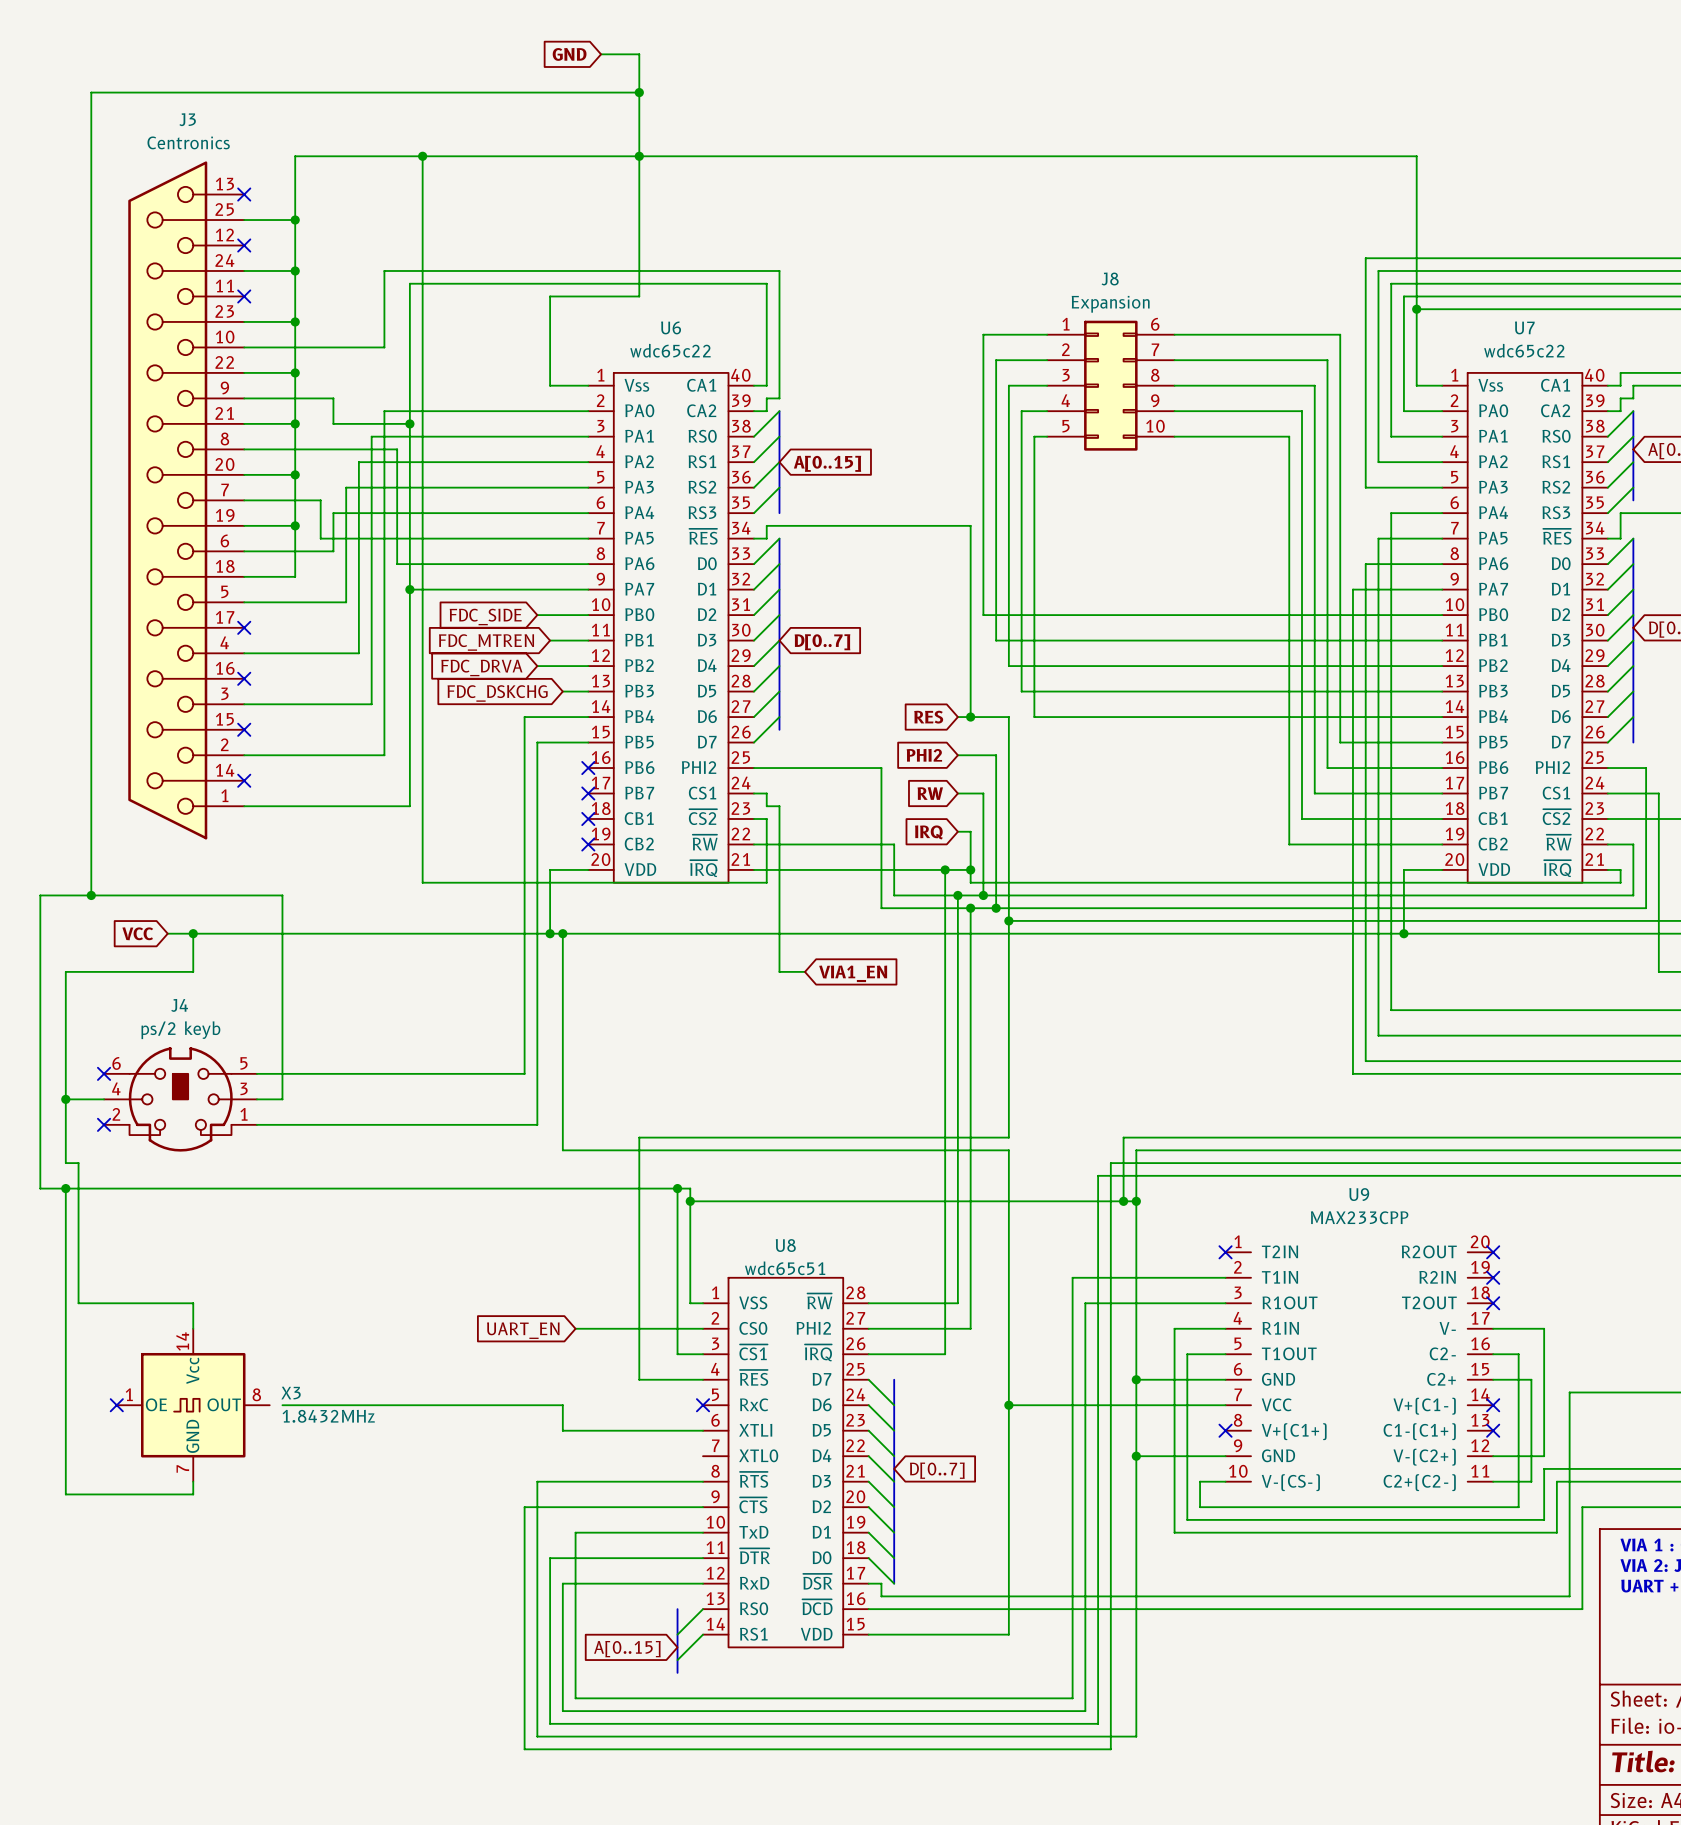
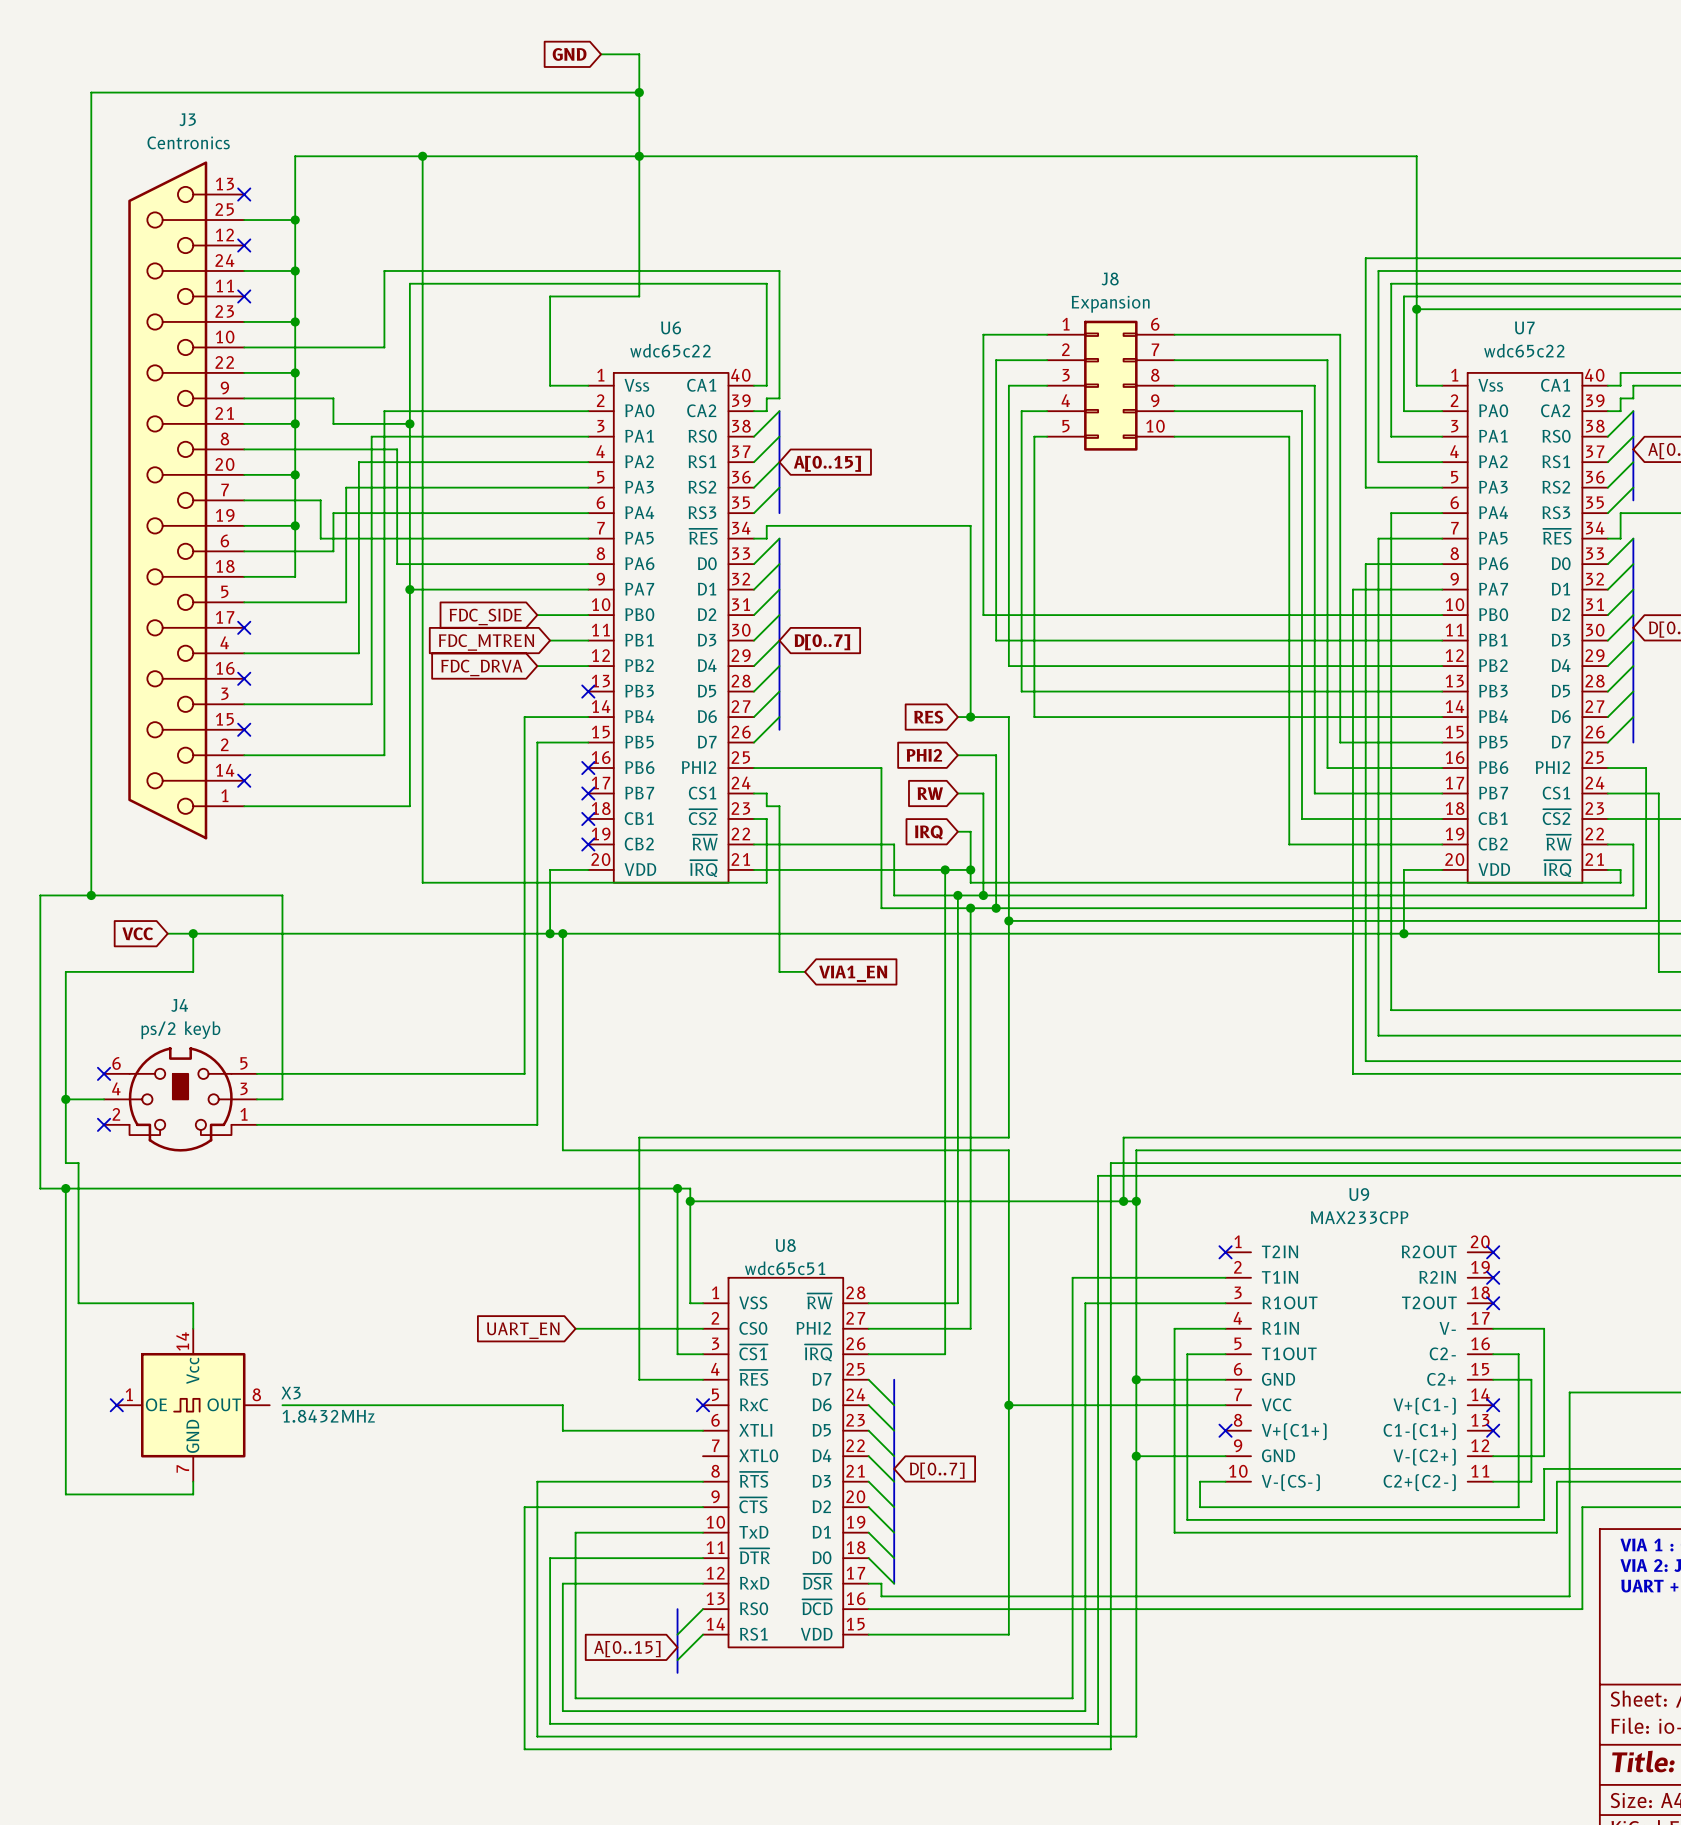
wire: (562, 691) (588, 691) -> none
no-connect mark: none -> (588, 691)
global label: FDC_DSKCHG (497, 693) -> none

